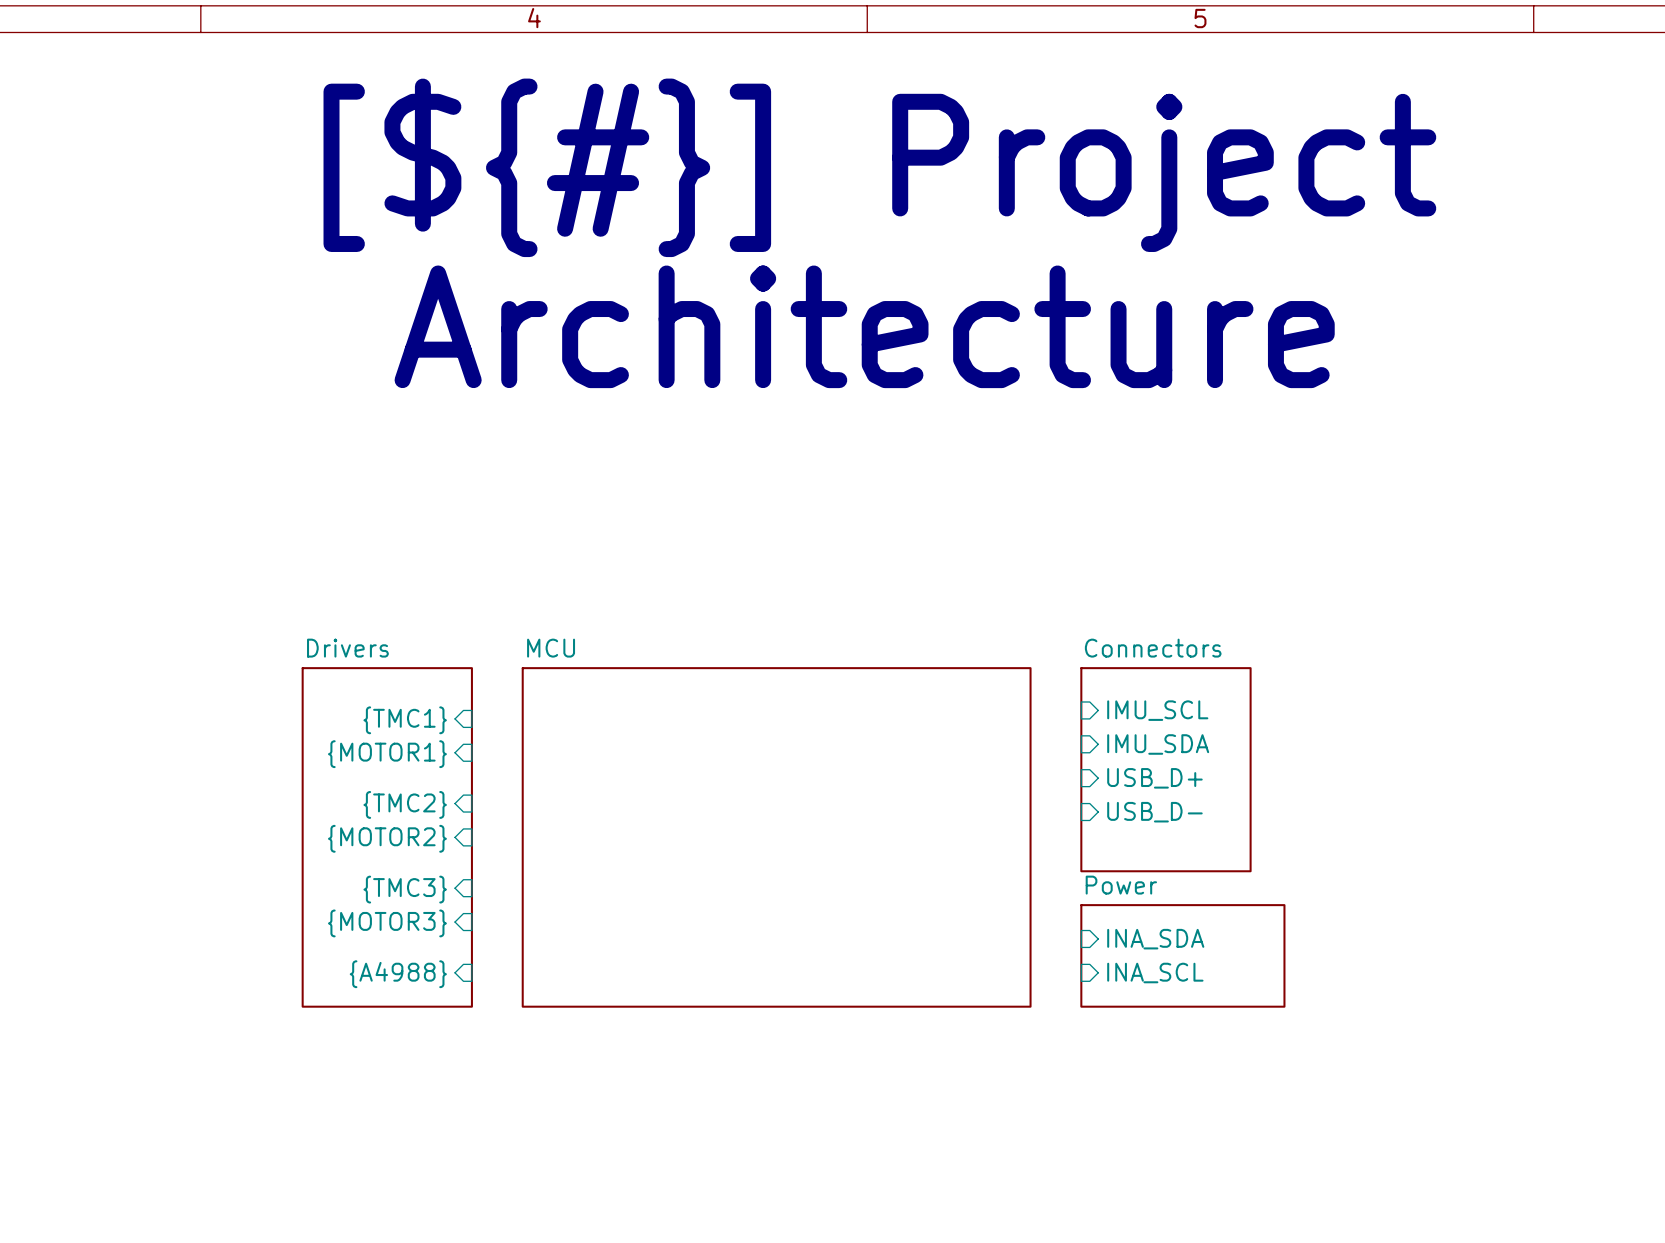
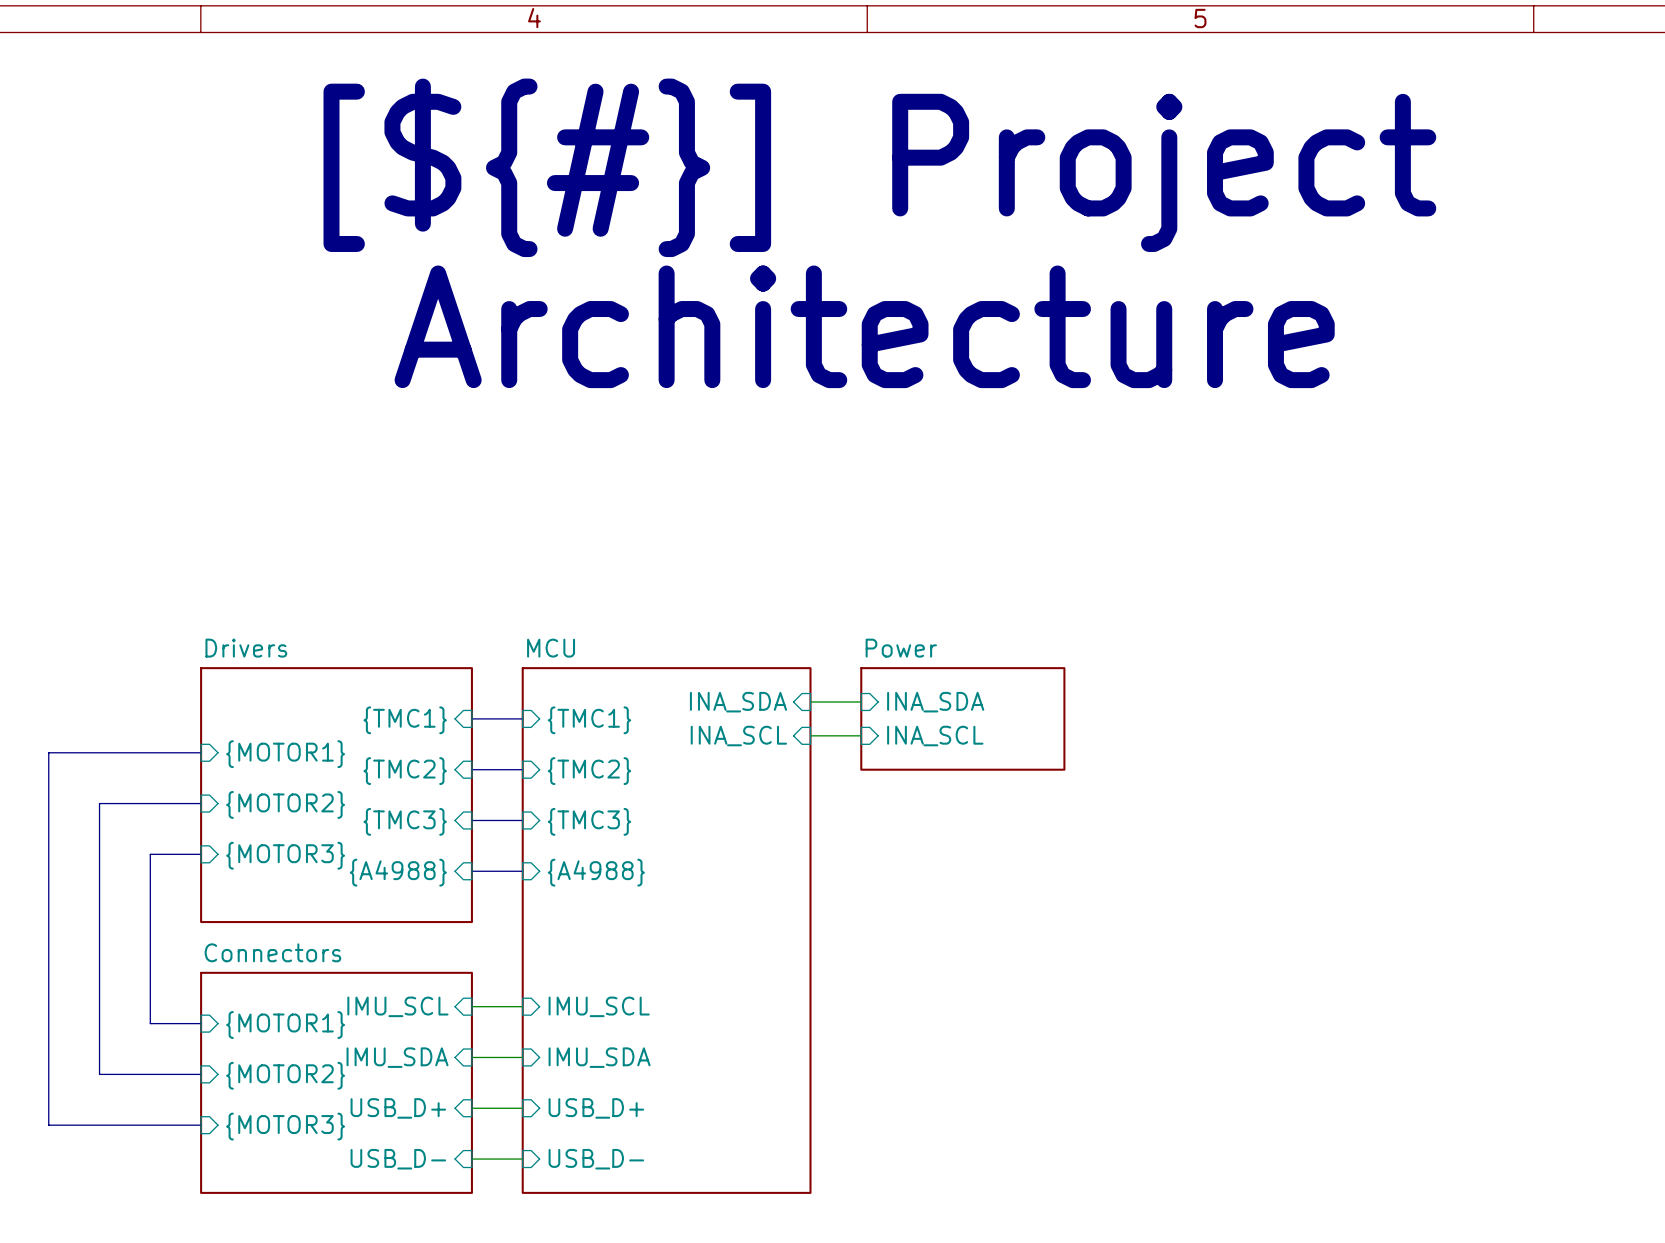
wire: none -> (810, 701) (861, 701)
sheet pin: none -> INA_SDA (738, 702)
sheet pin: none -> INA_SDA (935, 702)
sheet pin: IMU_SCL (1157, 710) -> none
bus: none -> (471, 718) (522, 718)
sheet pin: none -> {TMC1} (589, 720)
wire: none -> (810, 735) (861, 735)
sheet pin: none -> INA_SCL (738, 736)
sheet pin: none -> INA_SCL (935, 736)
sheet pin: IMU_SDA (1158, 744) -> none
bus: none -> (201, 752) (48, 752) (48, 1125) (201, 1125)
sheet pin rotation: 0° (387, 754) -> 180° (285, 754)
bus: none -> (471, 769) (522, 769)
sheet Connectors: (1165, 769) -> none
sheet pin: none -> {TMC2} (589, 771)
sheet pin: USB_D+ (1154, 778) -> none
sheet Drivers: none -> (336, 795)
bus: none -> (201, 803) (99, 803) (99, 1074) (201, 1074)
sheet pin: none -> {MOTOR2} (285, 804)
sheet pin position: {TMC2} (405, 804) -> {TMC2} (405, 771)
sheet pin: USB_D- (1154, 812) -> none
bus: none -> (471, 820) (522, 820)
sheet pin: none -> {TMC3} (405, 821)
sheet pin: none -> {TMC3} (589, 821)
sheet Drivers: (387, 837) -> none
sheet MCU: (776, 837) -> none
sheet pin: {MOTOR2} (387, 838) -> none
bus: none -> (201, 854) (150, 854) (150, 1023) (201, 1023)
sheet pin: none -> {MOTOR3} (285, 855)
bus: none -> (471, 871) (522, 871)
sheet pin: none -> {A4988} (398, 872)
sheet pin: none -> {A4988} (596, 872)
sheet pin: {TMC3} (405, 889) -> none
sheet pin: {MOTOR3} (387, 923) -> none
sheet MCU: none -> (666, 930)
sheet pin: INA_SDA (1155, 939) -> none
sheet Power position: (1182, 955) -> (962, 718)
sheet pin: INA_SCL (1155, 973) -> none
sheet pin: {A4988} (398, 974) -> none
sheet pin: none -> IMU_SCL (397, 1006)
wire: none -> (471, 1006) (522, 1006)
sheet pin: none -> IMU_SCL (599, 1006)
sheet pin: none -> {MOTOR1} (285, 1024)
sheet pin: none -> IMU_SDA (397, 1057)
wire: none -> (471, 1057) (522, 1057)
sheet pin: none -> IMU_SDA (599, 1057)
sheet pin: none -> {MOTOR2} (285, 1075)
sheet Connectors: none -> (336, 1082)
sheet pin: none -> USB_D+ (398, 1108)
wire: none -> (471, 1108) (522, 1108)
sheet pin: none -> USB_D+ (596, 1108)
sheet pin: none -> {MOTOR3} (285, 1126)
sheet pin: none -> USB_D- (398, 1159)
wire: none -> (471, 1159) (522, 1159)
sheet pin: none -> USB_D- (596, 1159)

